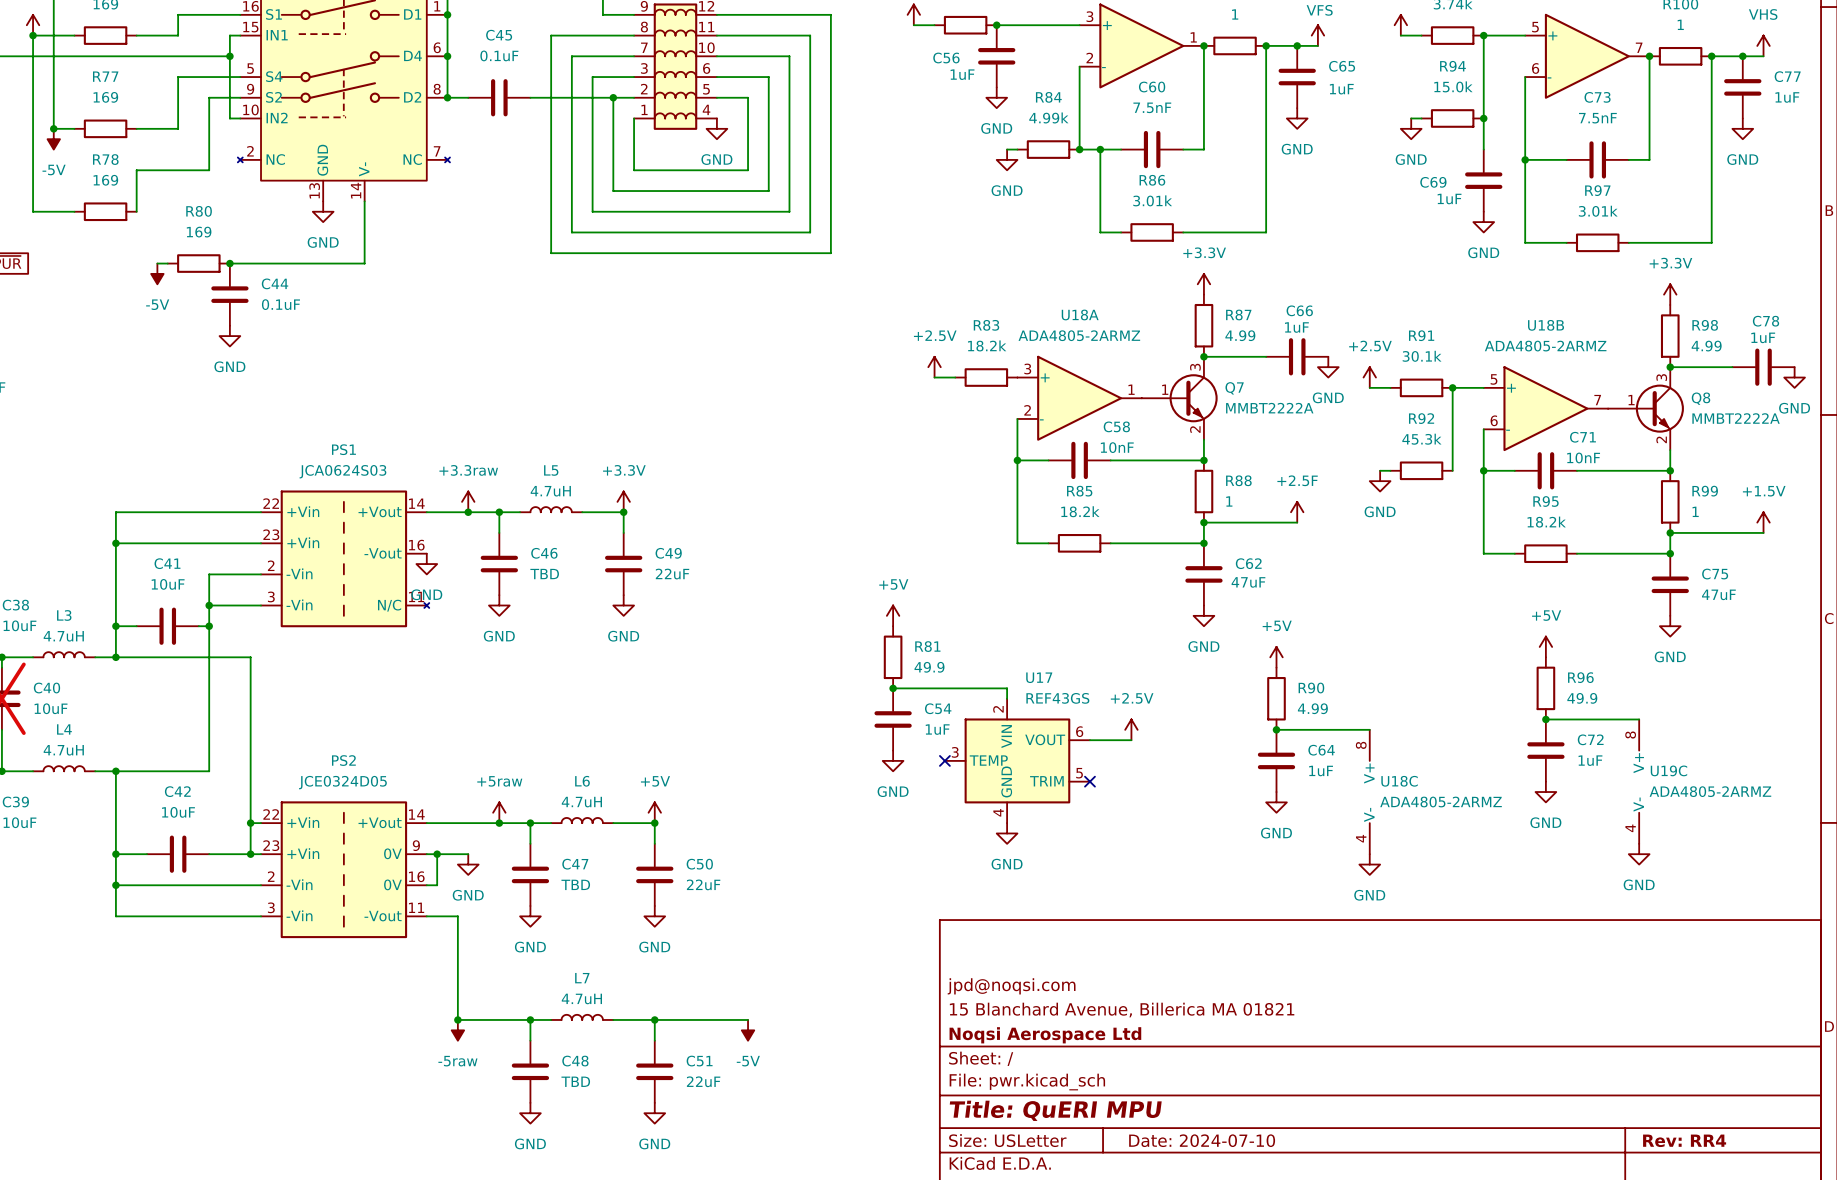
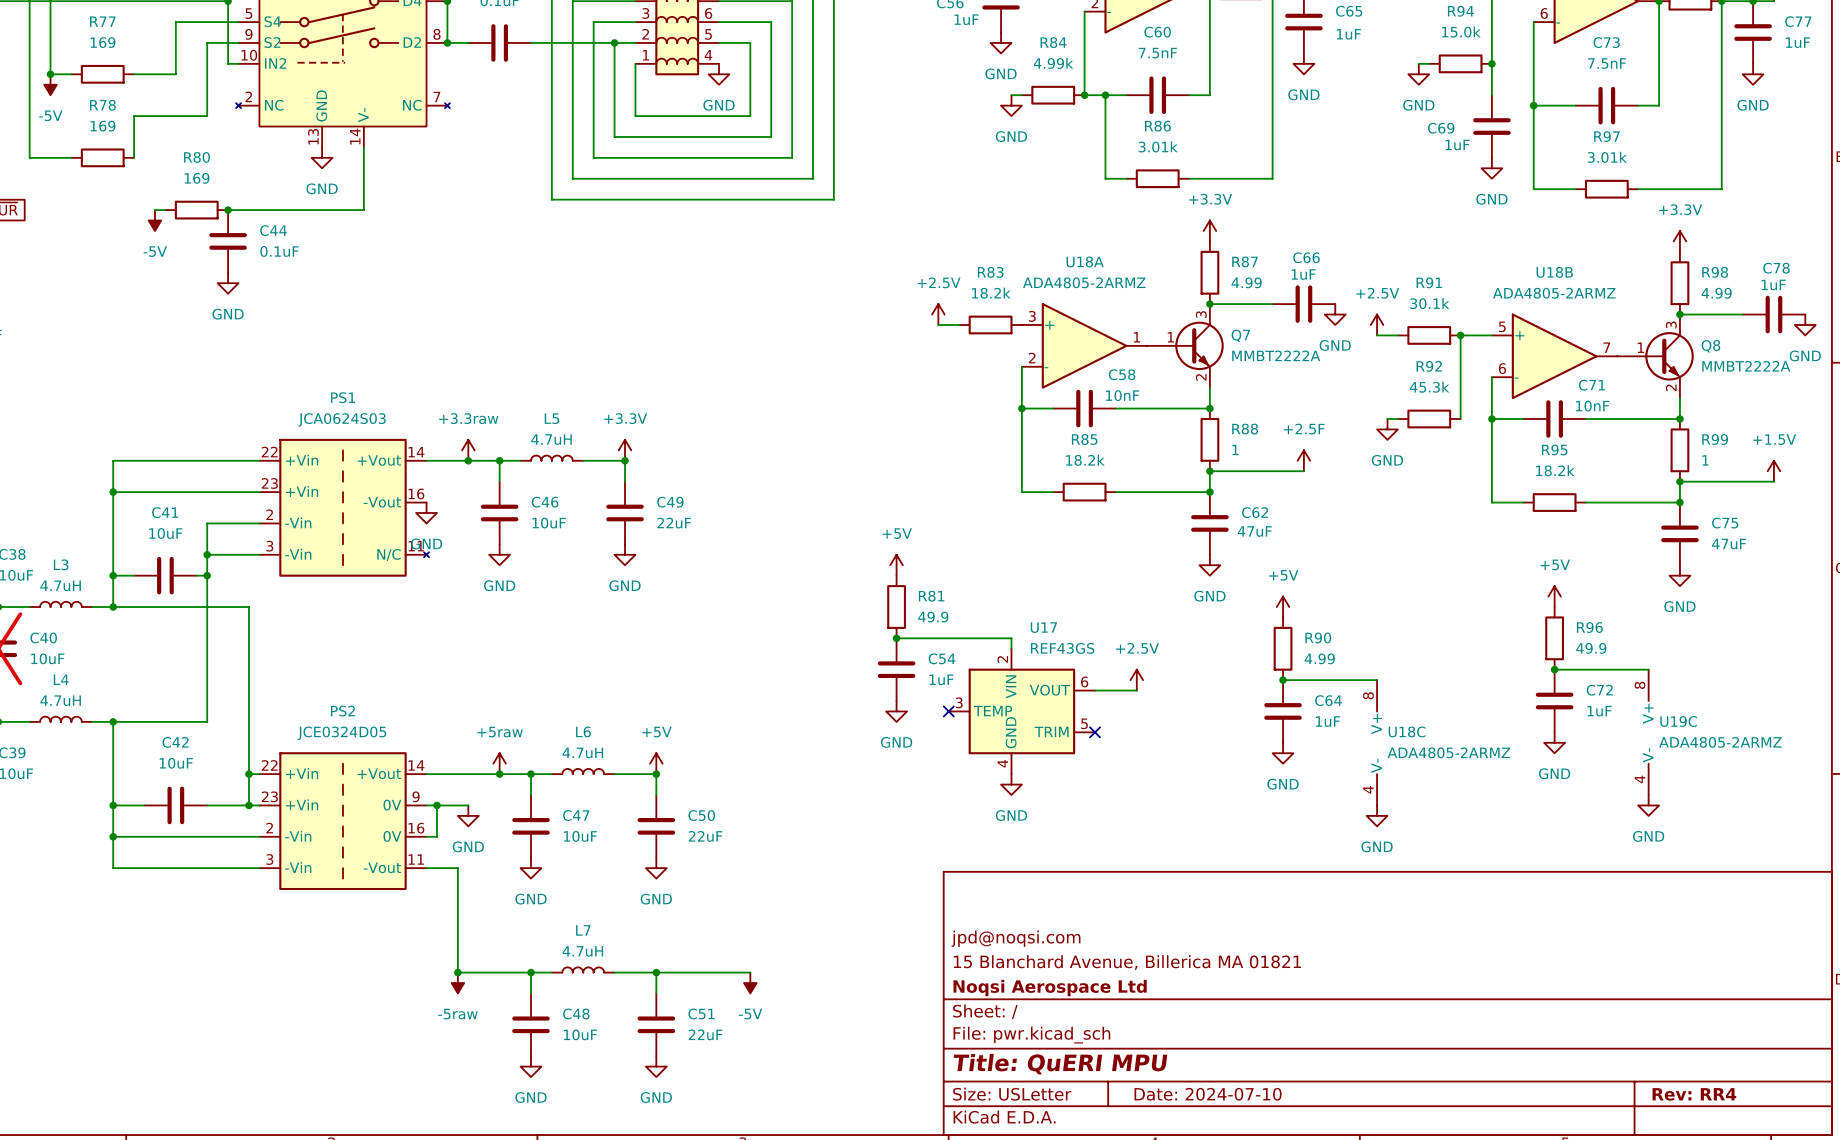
C46 value: TBD (544, 574) -> 10uF (549, 523)
C47 value: TBD (575, 884) -> 10uF (580, 836)
C48 value: TBD (575, 1081) -> 10uF (580, 1034)

